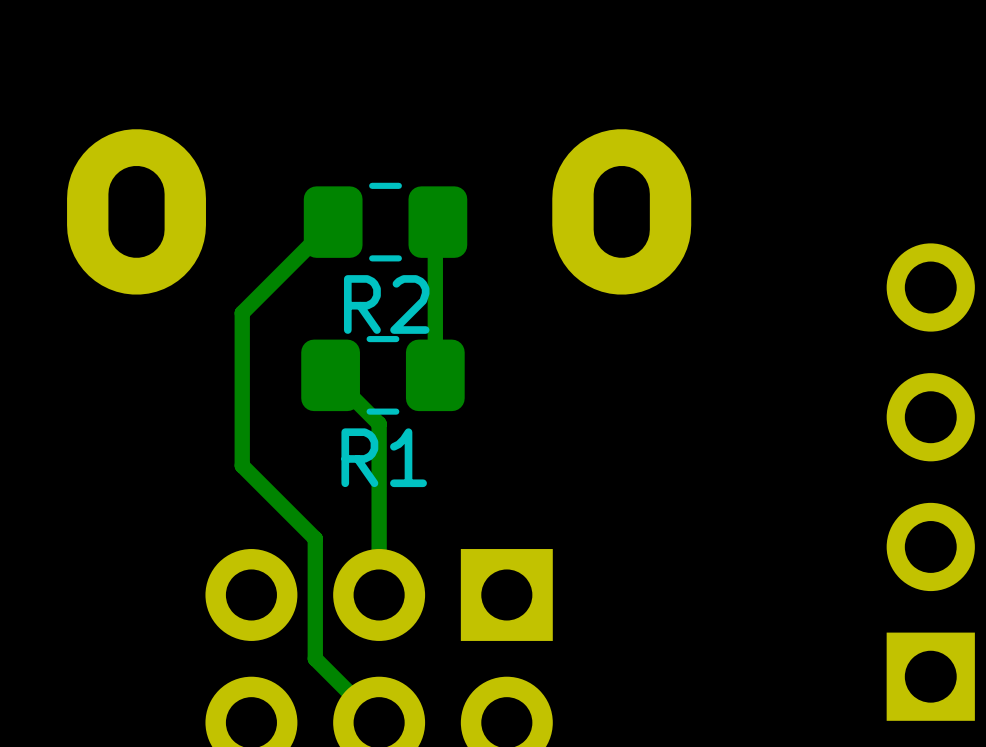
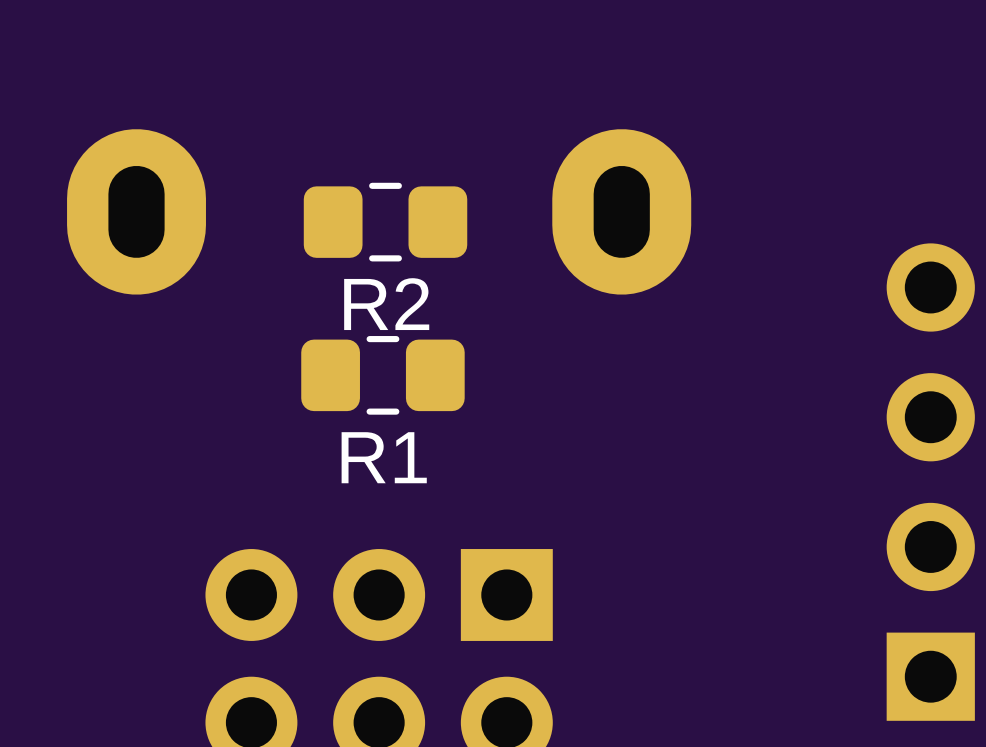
track: (333, 222) (242, 313) (242, 465) (315, 538) (315, 658) (379, 722) -> none
track: (437, 222) (435, 224) (435, 375) -> none
track: (330, 375) (379, 423) (379, 594) -> none

